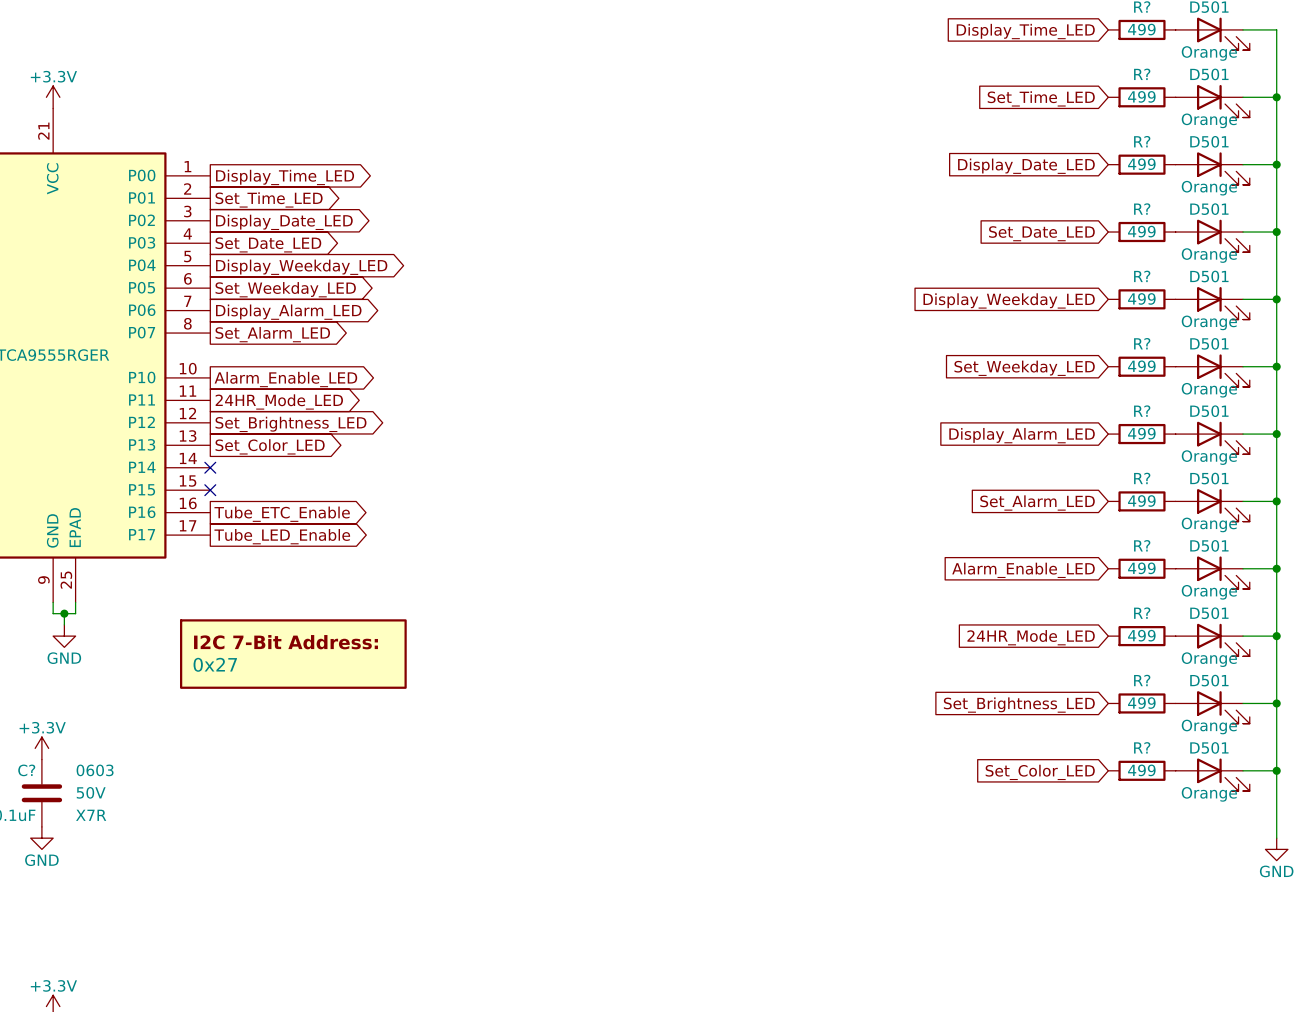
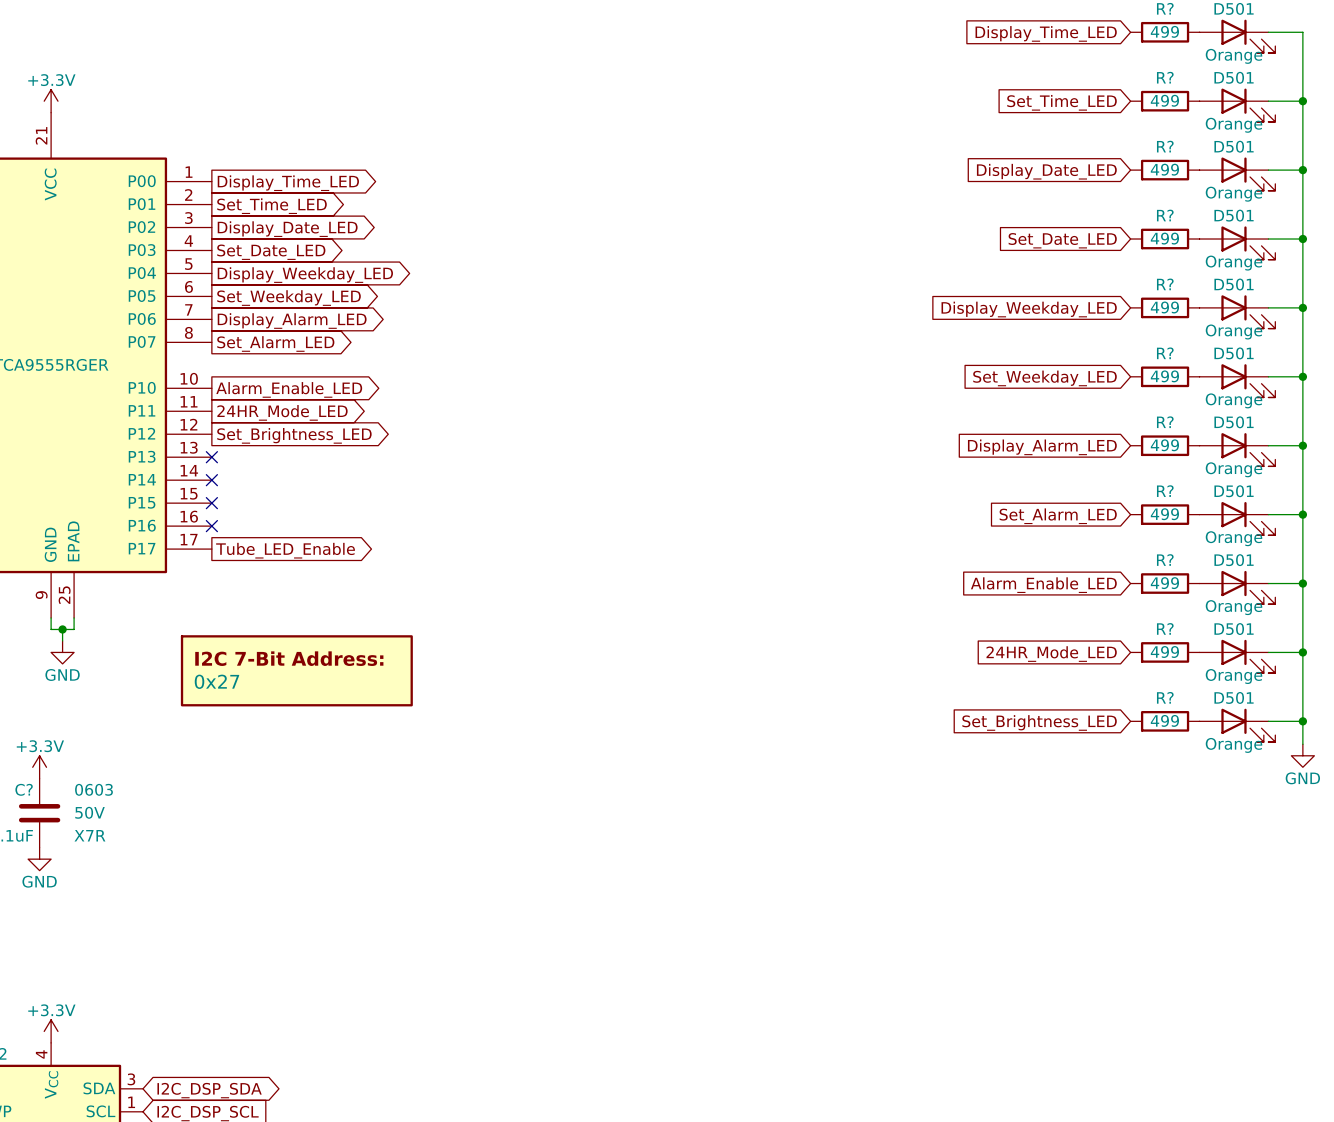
no-connect mark: none -> (211, 457)
global label: Set_Color_LED (270, 446) -> none
no-connect mark: none -> (211, 526)
global label: Tube_ETC_Enable (282, 514) -> none
wire: (1276, 725) (1276, 838) -> none
R?: 499 (1141, 770) -> none
wire: (1243, 770) (1276, 770) -> none
junction: (1276, 770) -> none
global label: Set_Color_LED (1040, 772) -> none
D501: Orange (1212, 774) -> none
power symbol position: GND (1276, 849) -> GND (1302, 755)

